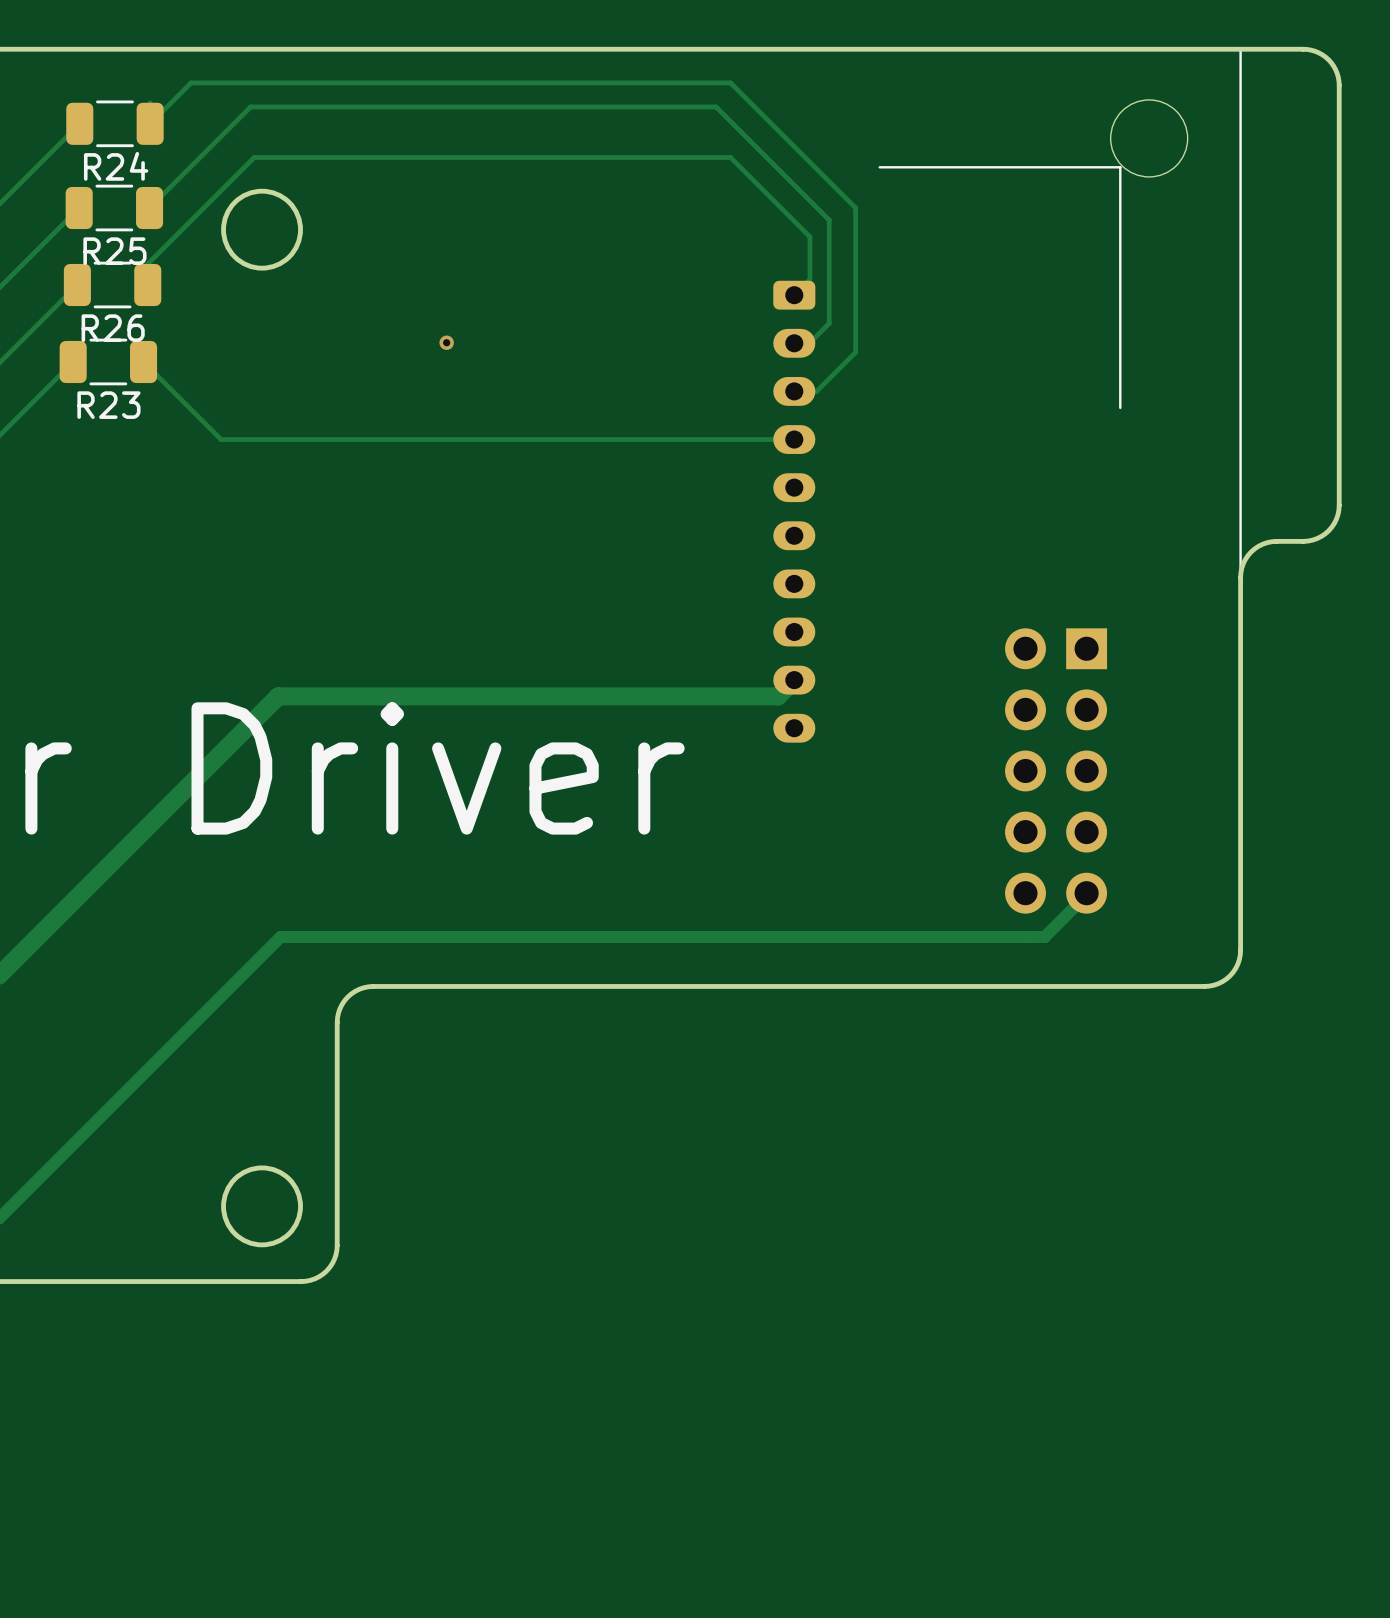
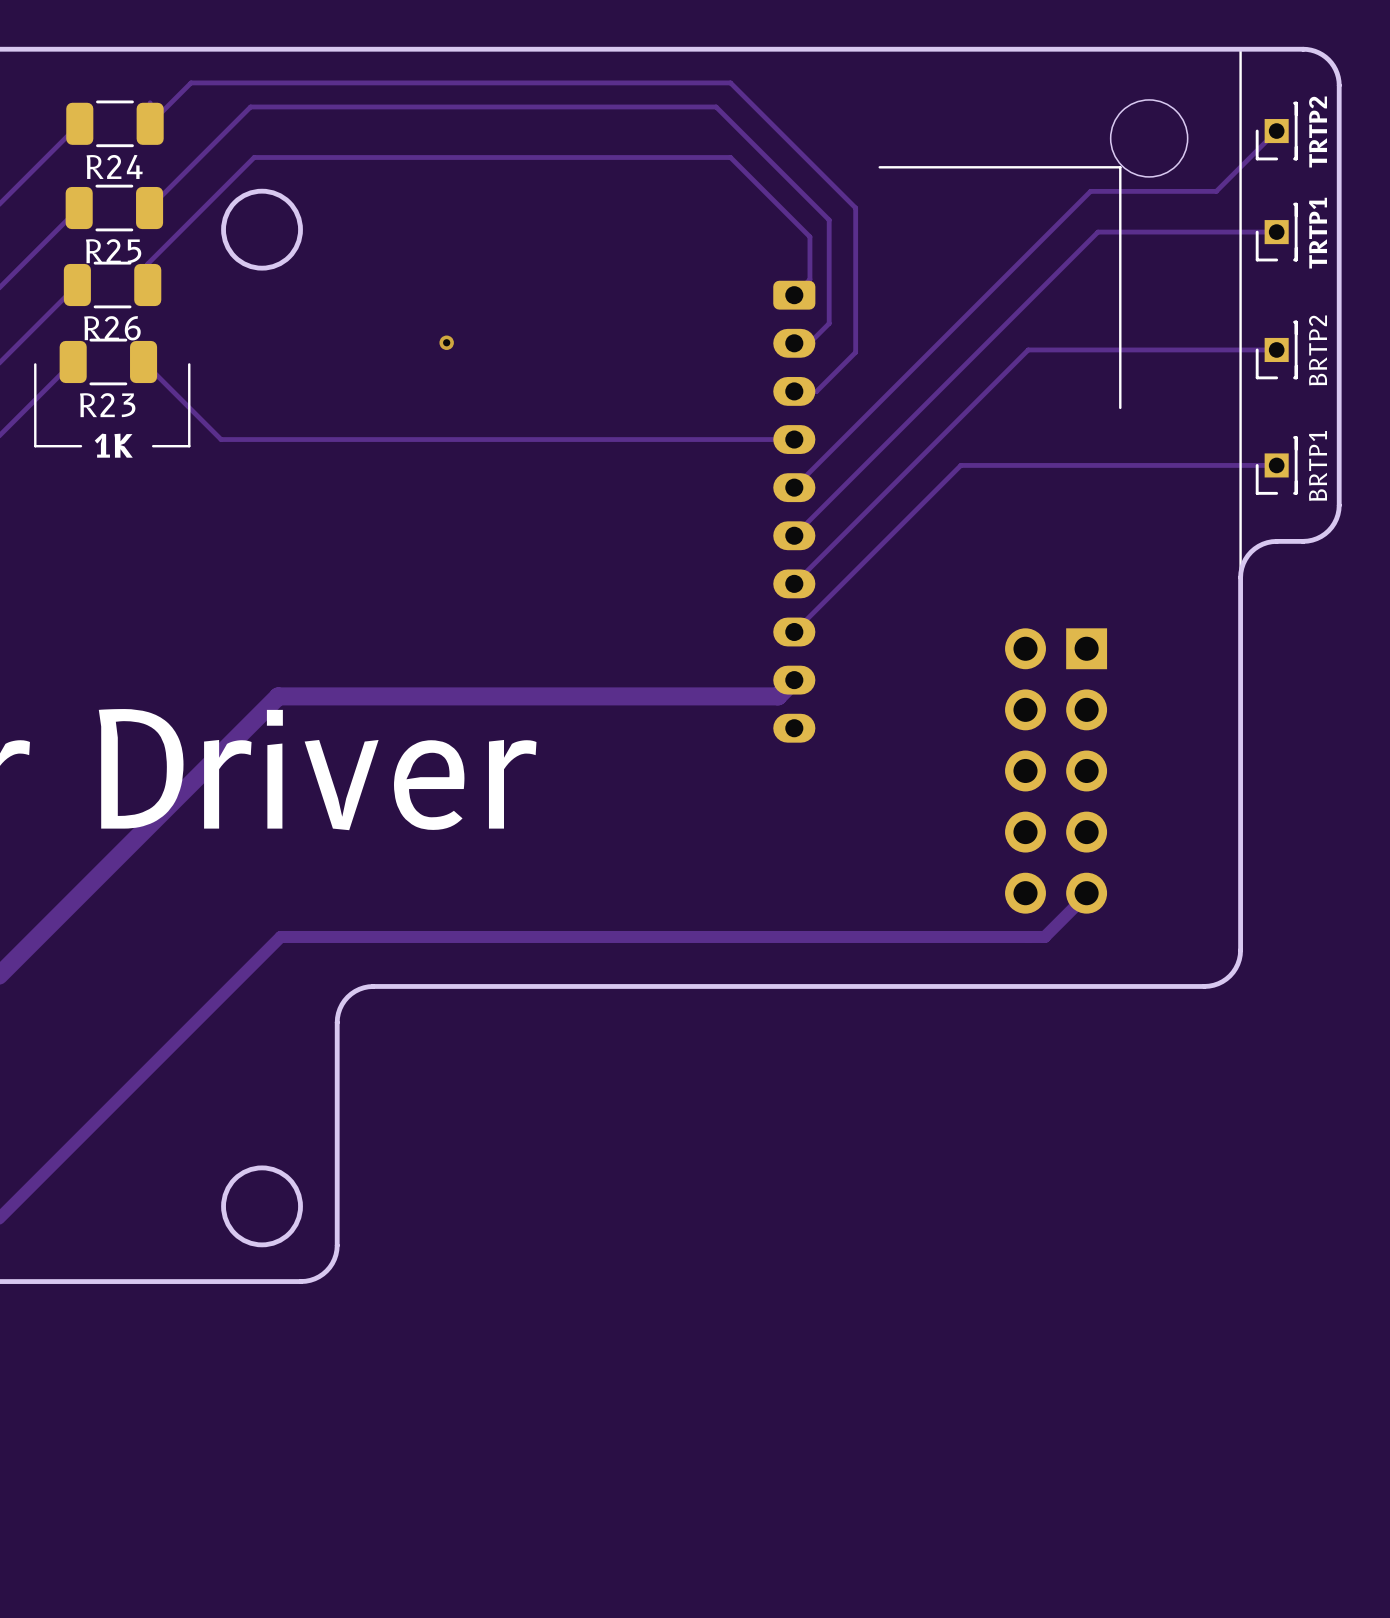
track: none -> (1276, 131) (1216, 191) (1090, 191) (794, 487)
part: none -> TRTP2 (1276, 131)
track: none -> (1276, 232) (1097, 232) (794, 535)
part: none -> TRTP1 (1276, 232)
track: none -> (1276, 349) (1028, 349) (794, 583)
part: none -> BRTP2 (1276, 349)
line: none -> (35, 364) (35, 446) (80, 446)
line: none -> (189, 364) (189, 446) (153, 446)
text: none -> 1K (113, 445)
track: none -> (1276, 465) (960, 465) (794, 631)
part: none -> BRTP1 (1276, 465)

